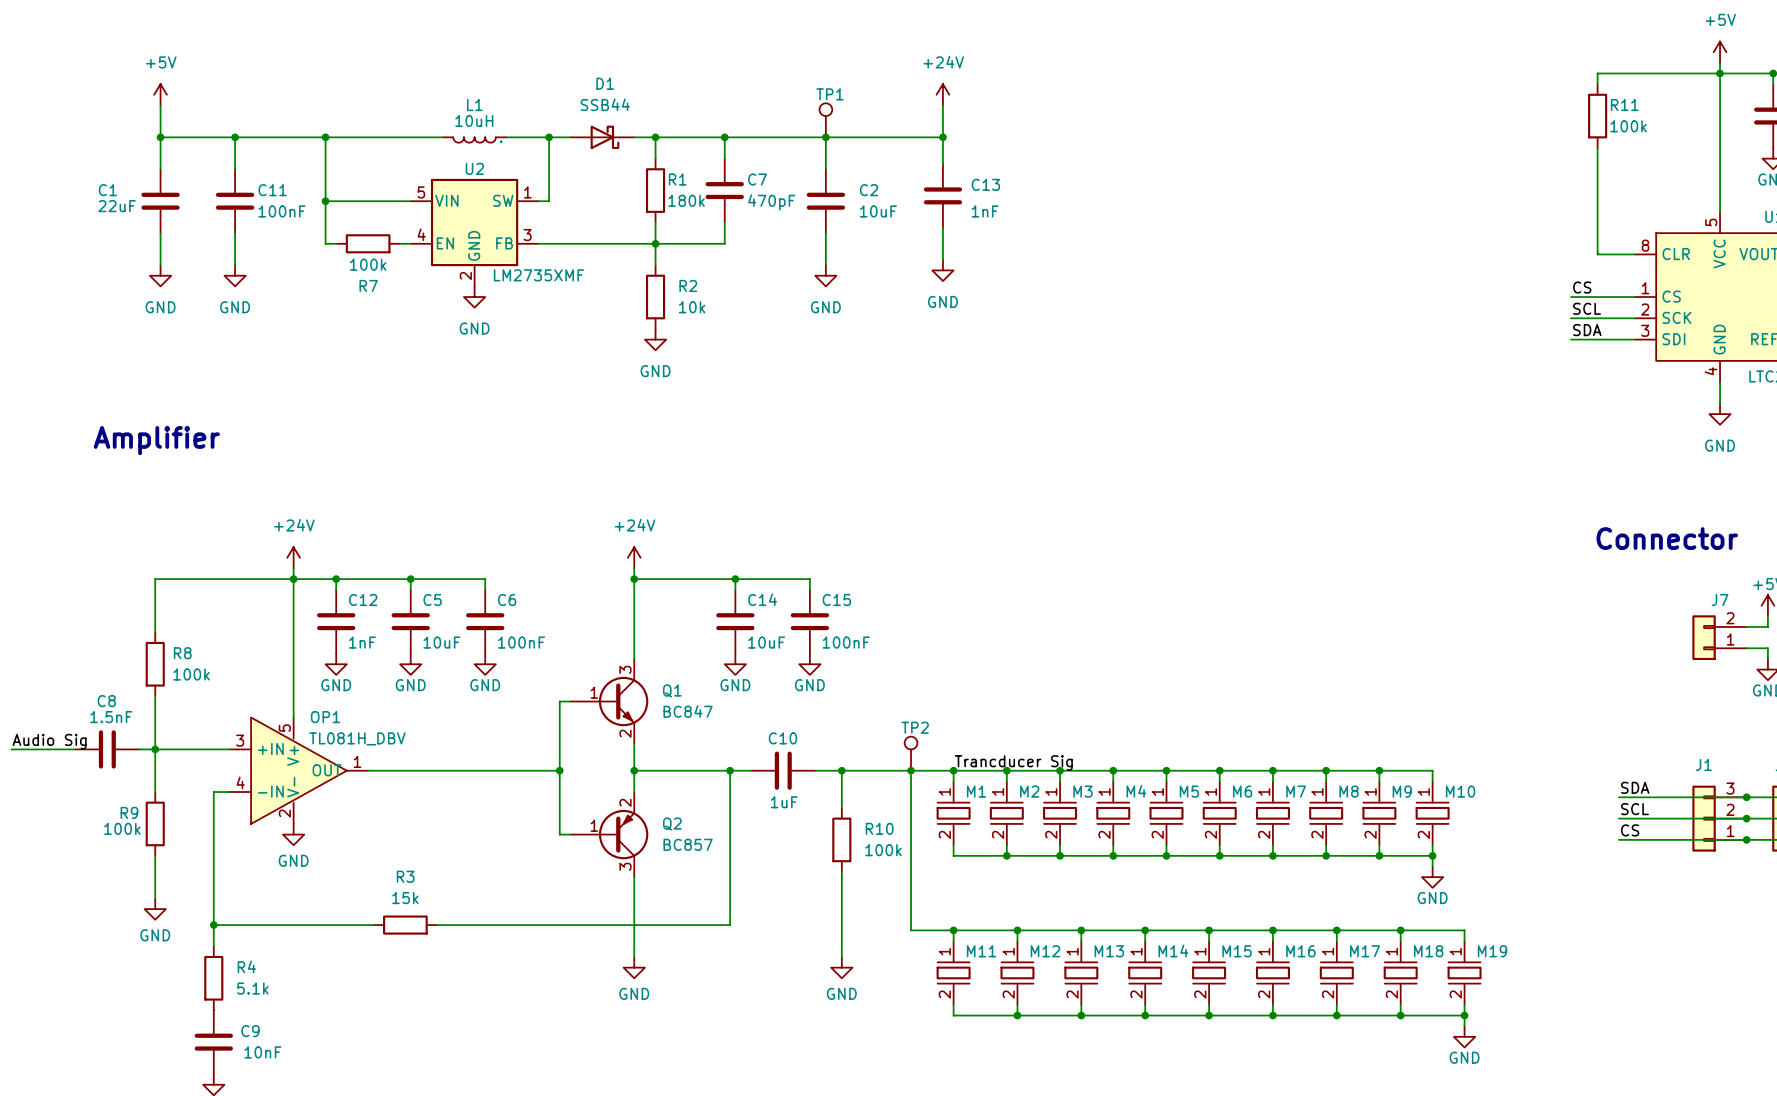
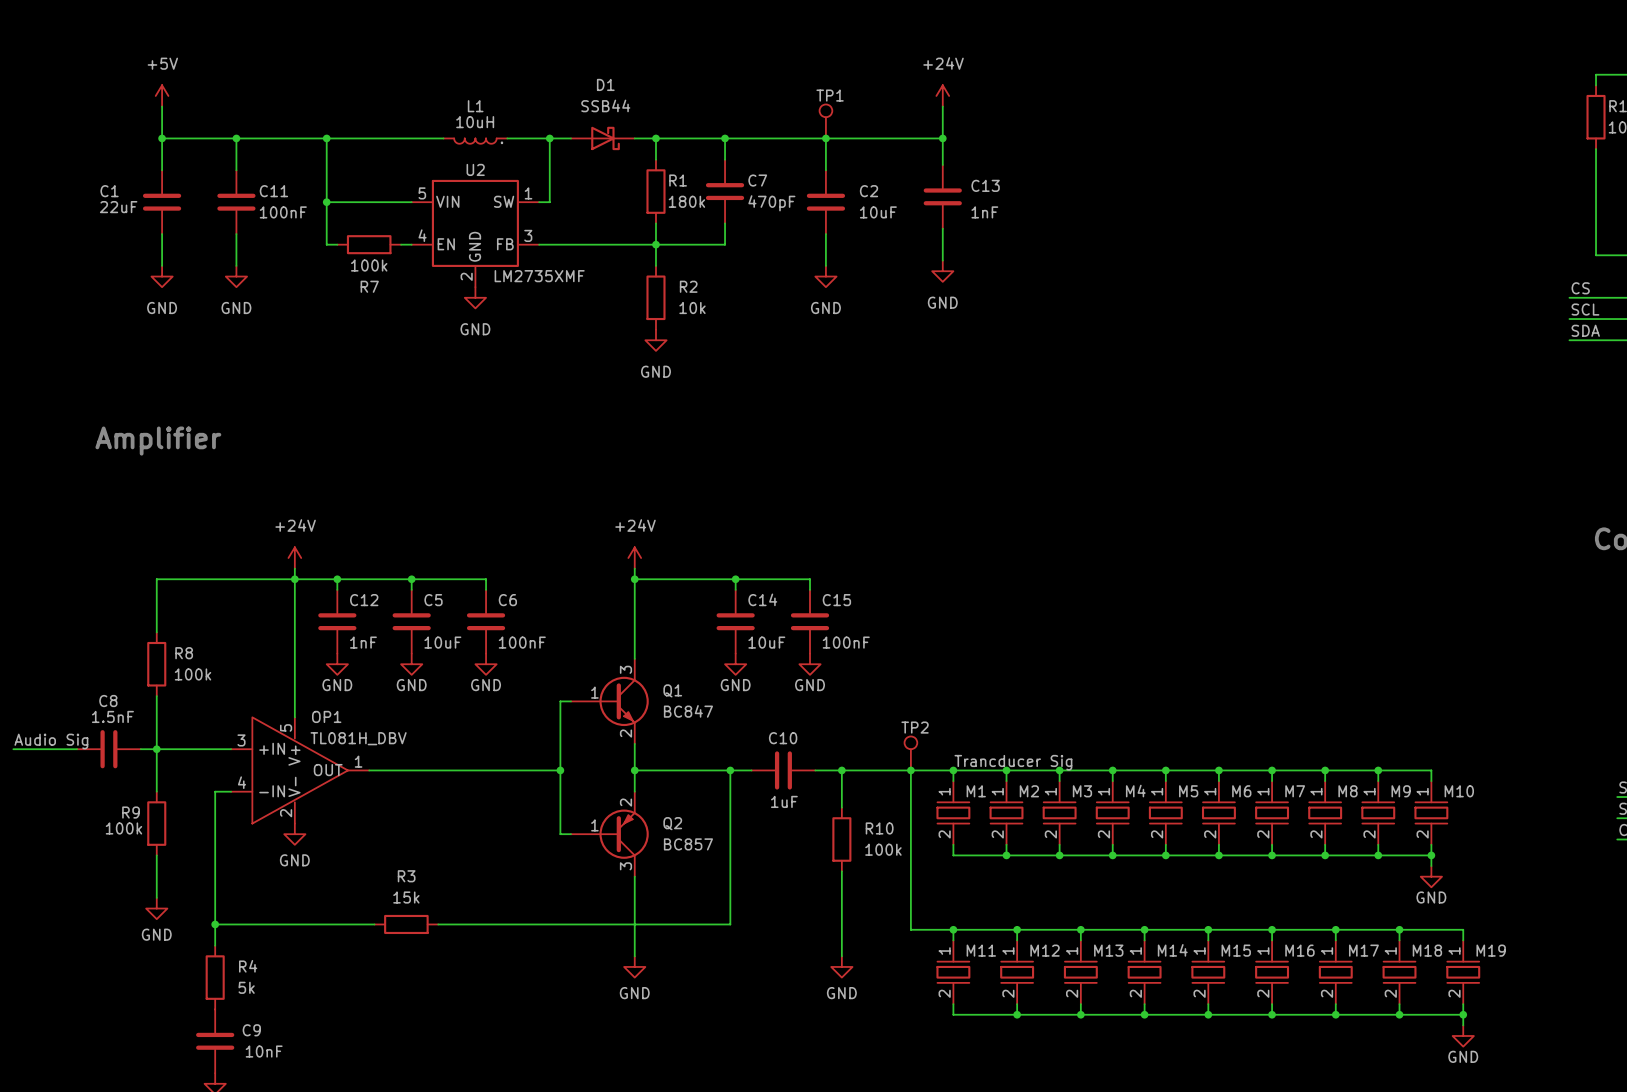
R4 value: 5.1k (252, 988) -> 5k (246, 987)

